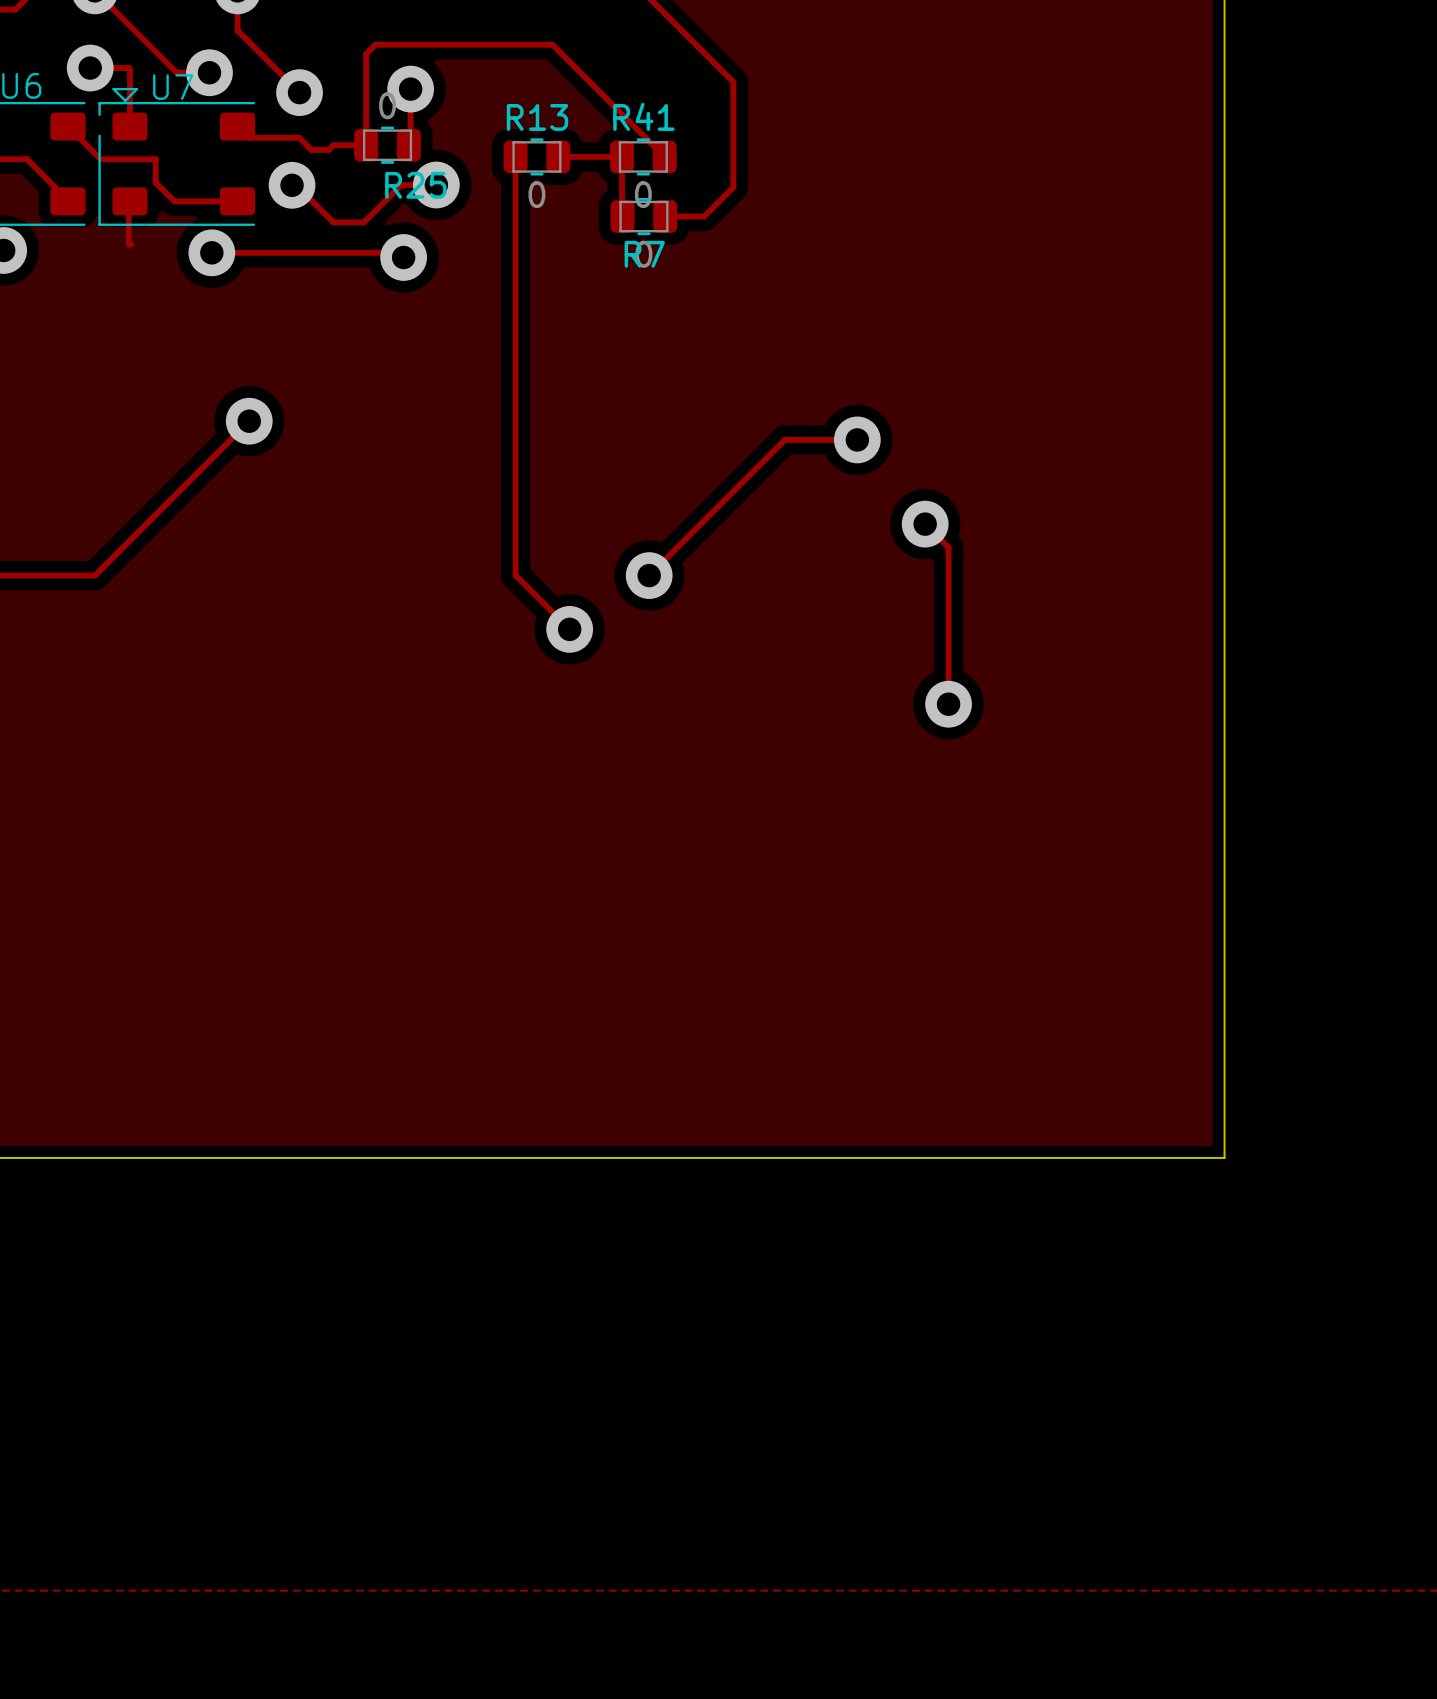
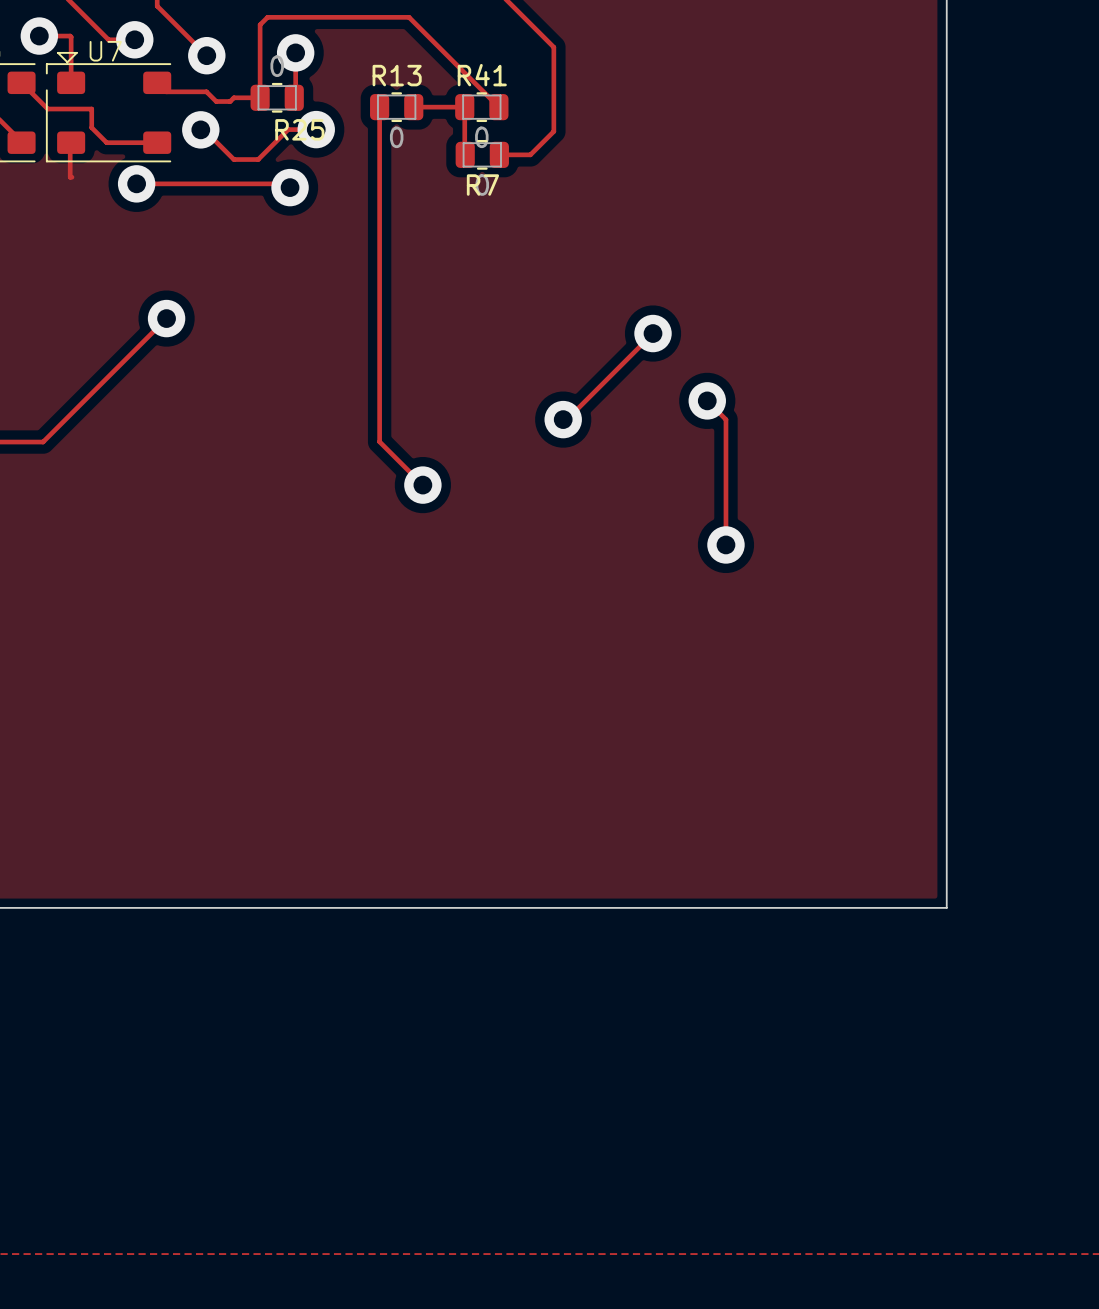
track: (857, 439) (784, 439) (649, 575) -> (653, 333) (566, 419) (563, 419)
via position: (649, 575) -> (563, 419)

